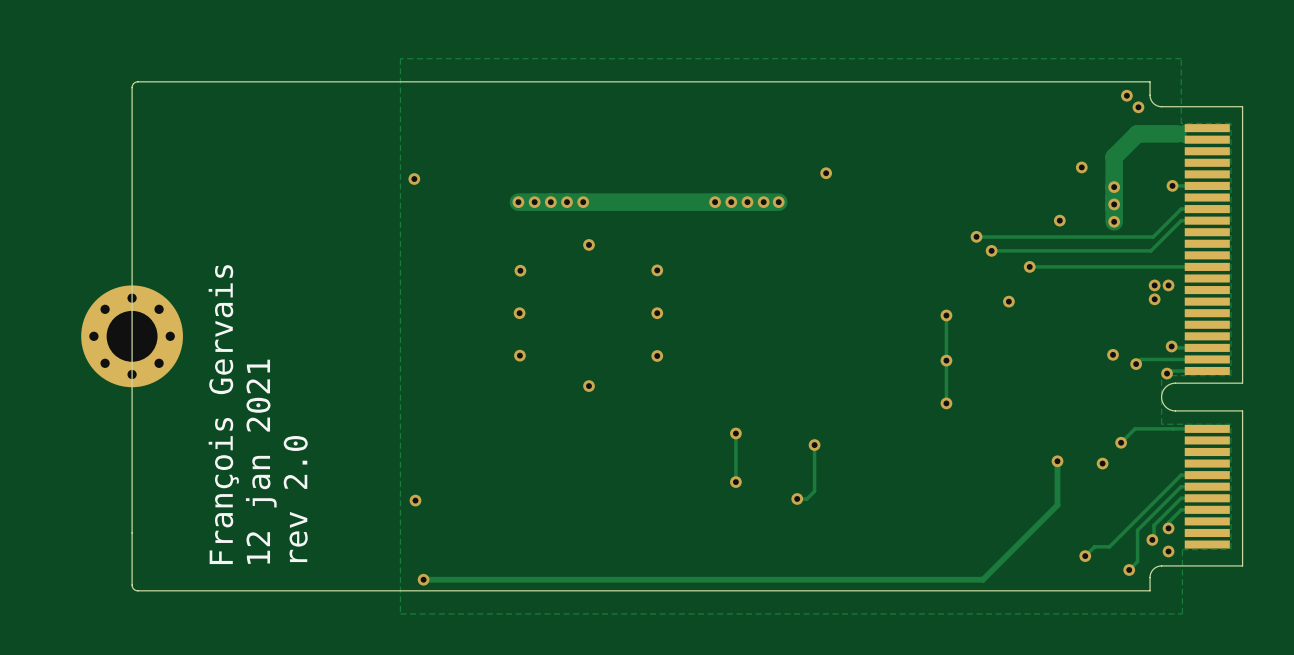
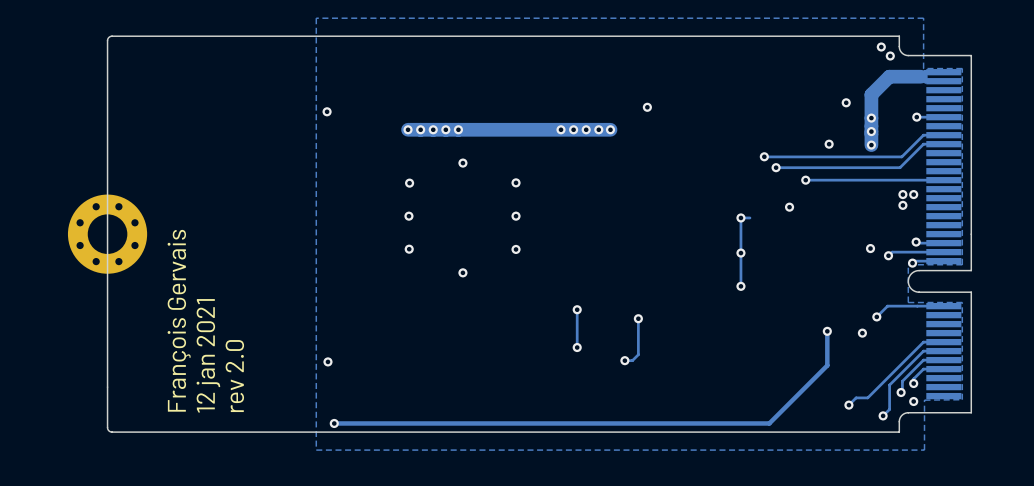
track: none -> (749, 217) (740, 217)
part rotation: 0° (132, 336) -> 22.5° clockwise (107, 234)

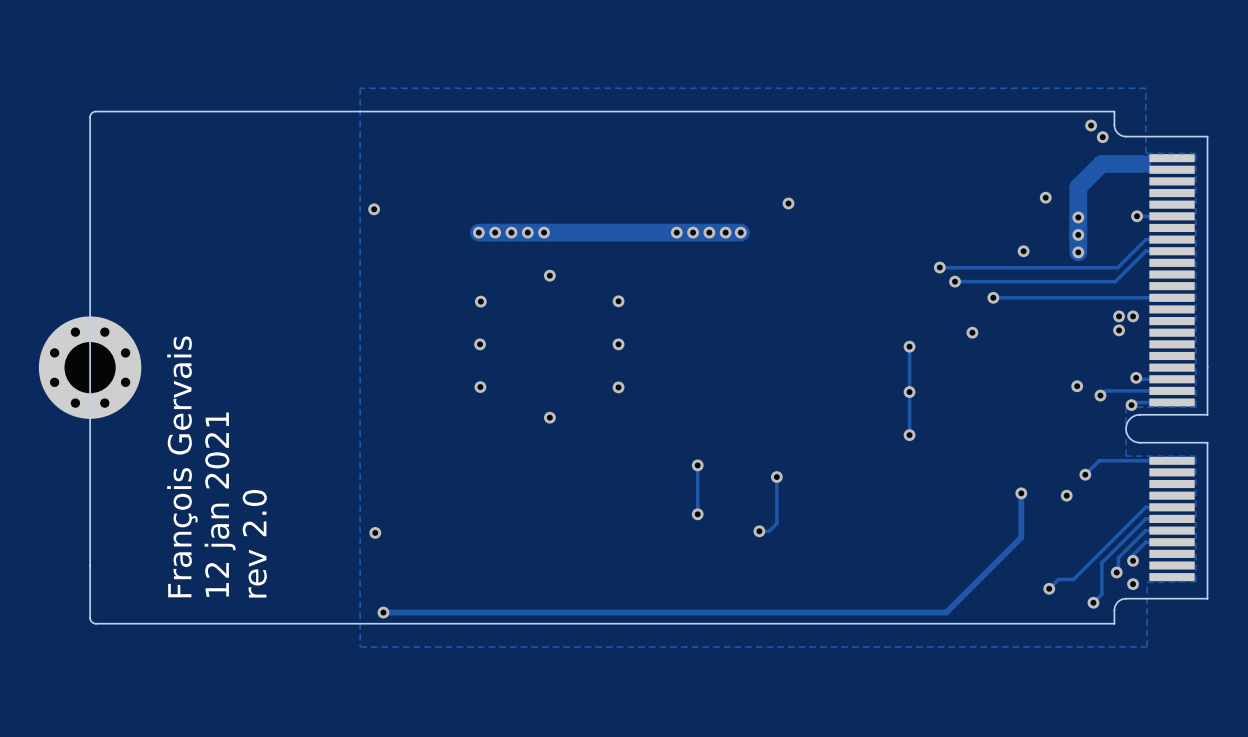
track: (749, 217) (740, 217) -> none

